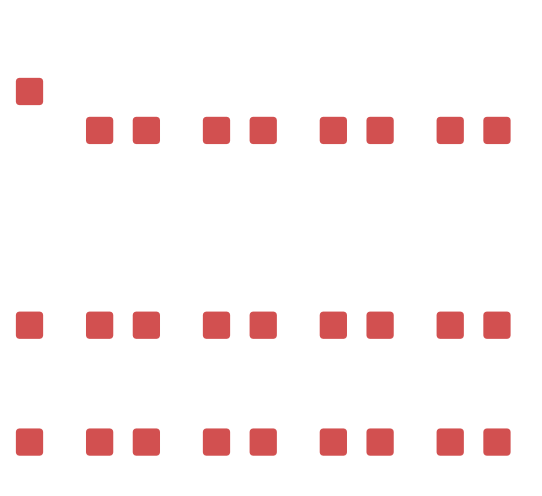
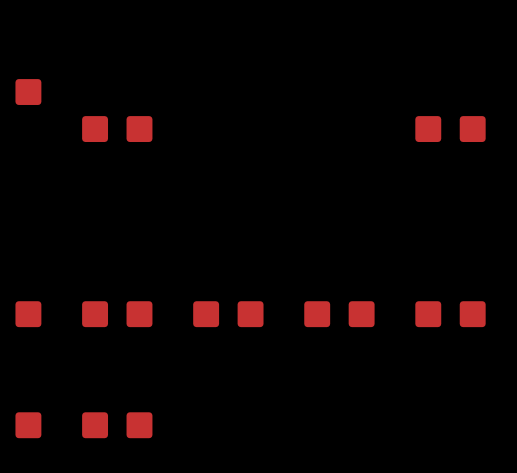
part: (239, 130) -> none
part: (356, 130) -> none
part: (239, 442) -> none
part: (356, 442) -> none
part: (473, 442) -> none

